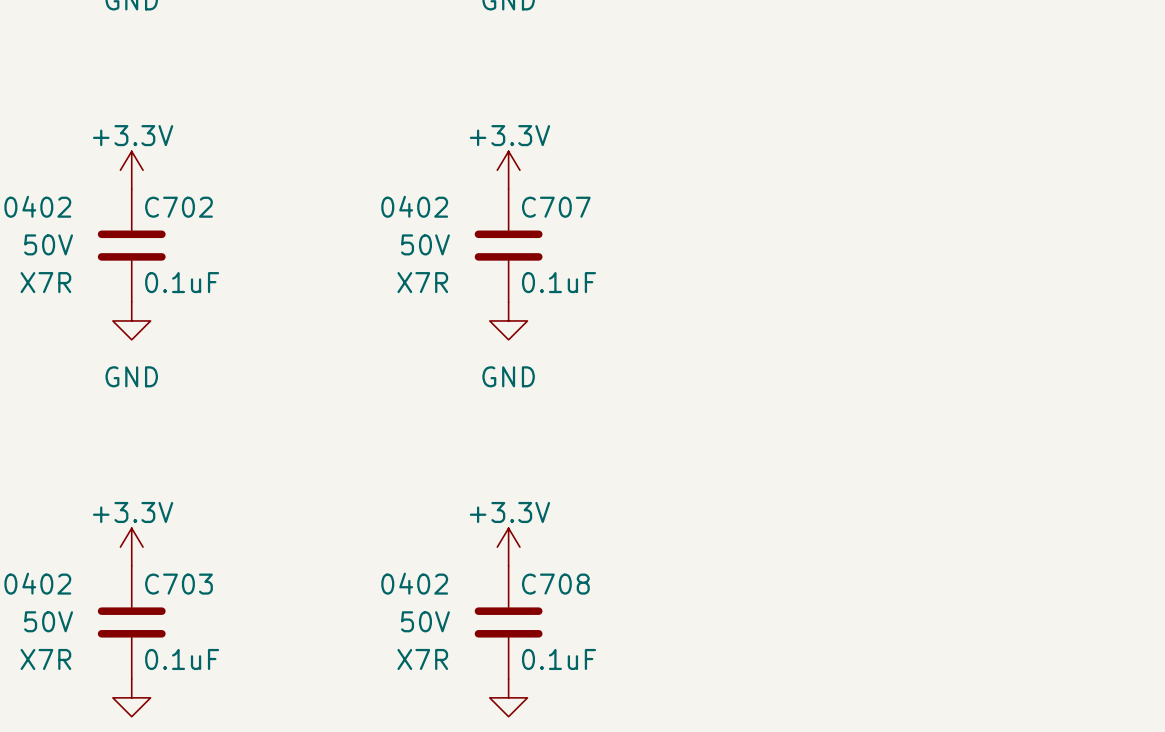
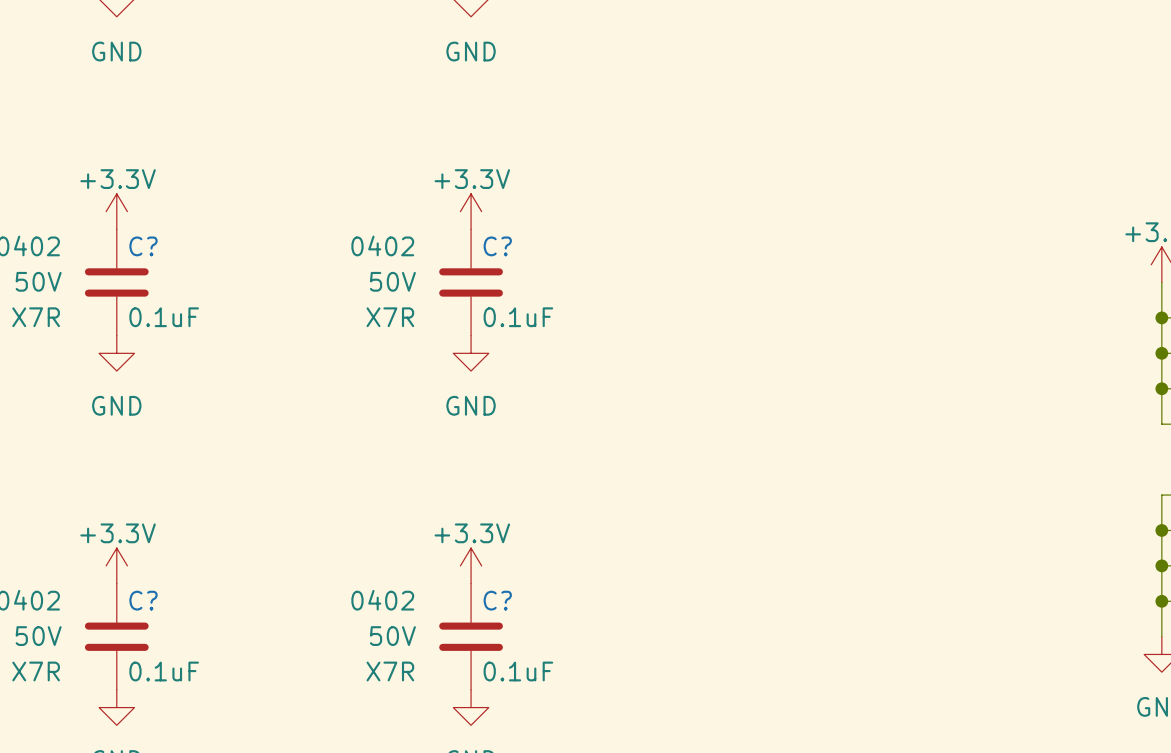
C702 name: C702 (178, 207) -> C? (143, 246)
C707 name: C707 (556, 207) -> C? (497, 246)
C703 name: C703 (178, 584) -> C? (143, 600)
C708 name: C708 (555, 584) -> C? (497, 600)

